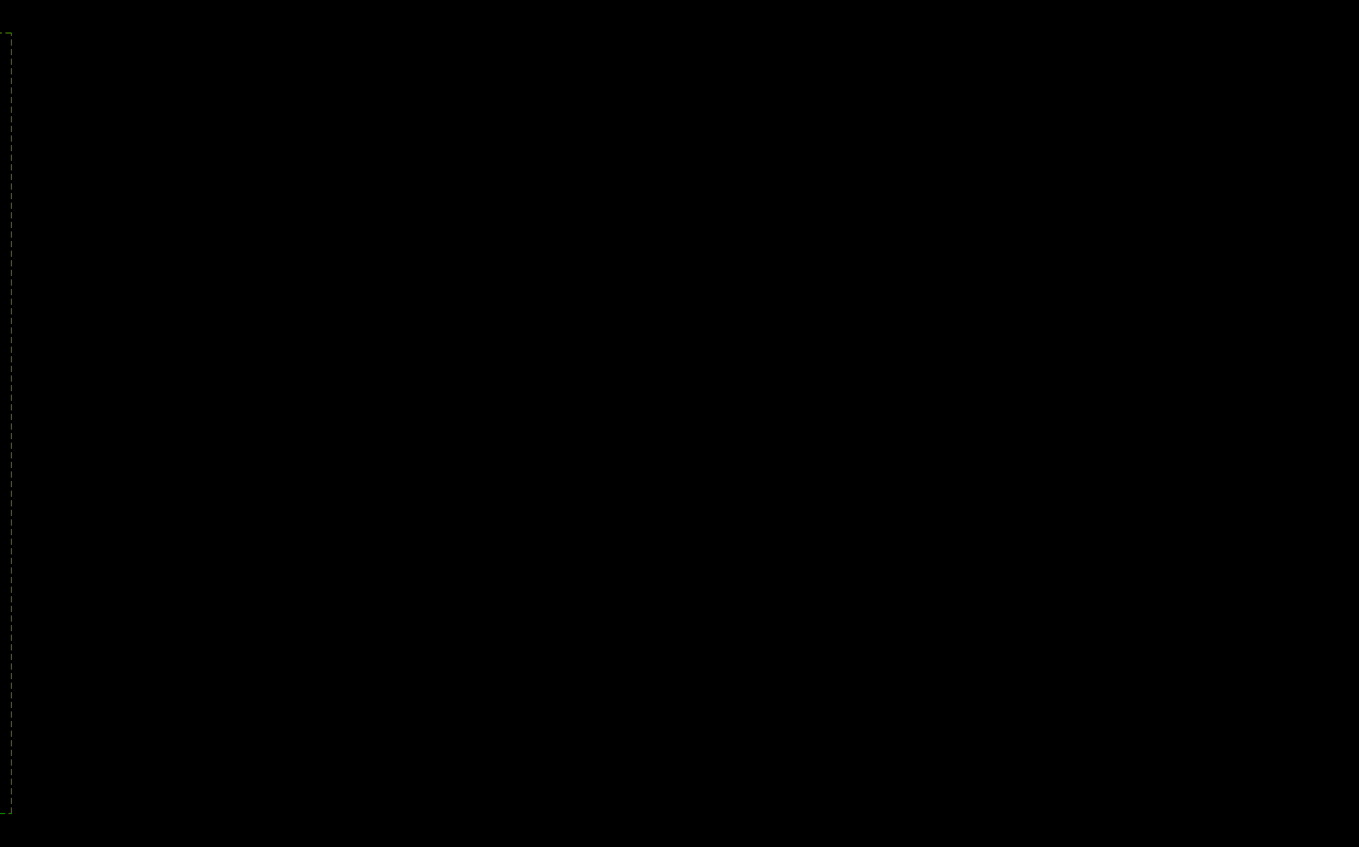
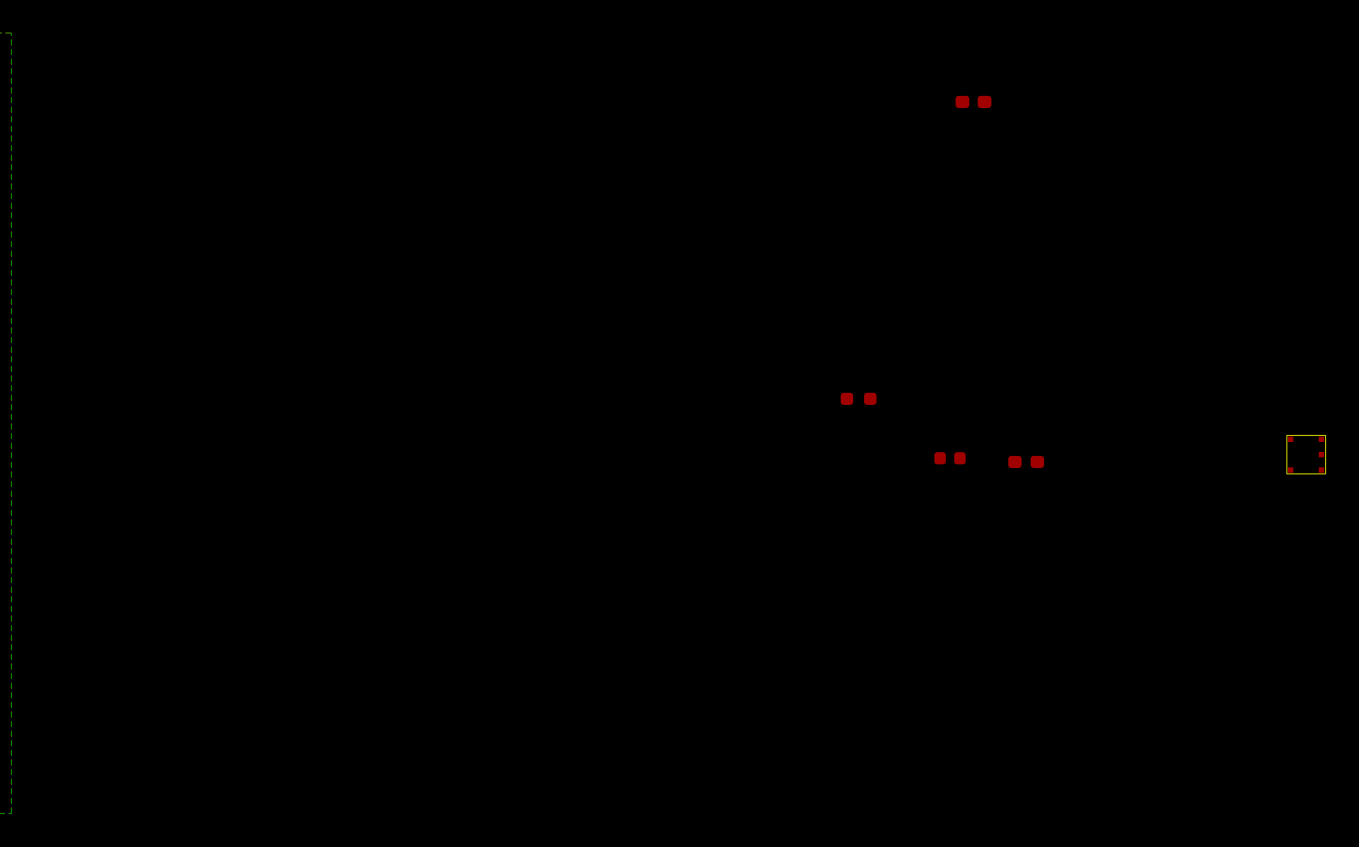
part: none -> (973, 101)
part: none -> (858, 398)
part: none -> (1306, 454)
part: none -> (950, 458)
part: none -> (1026, 461)

